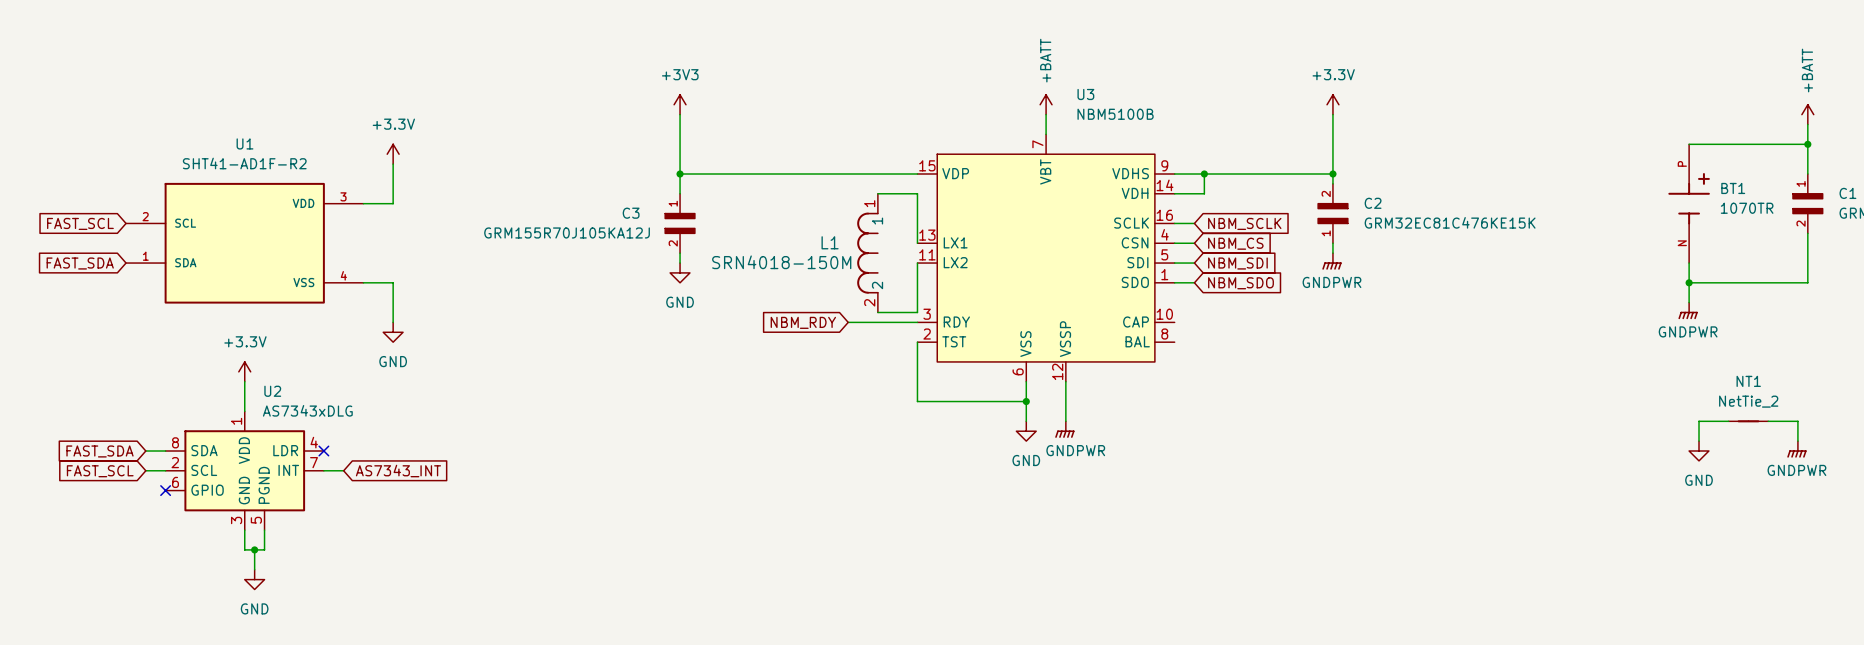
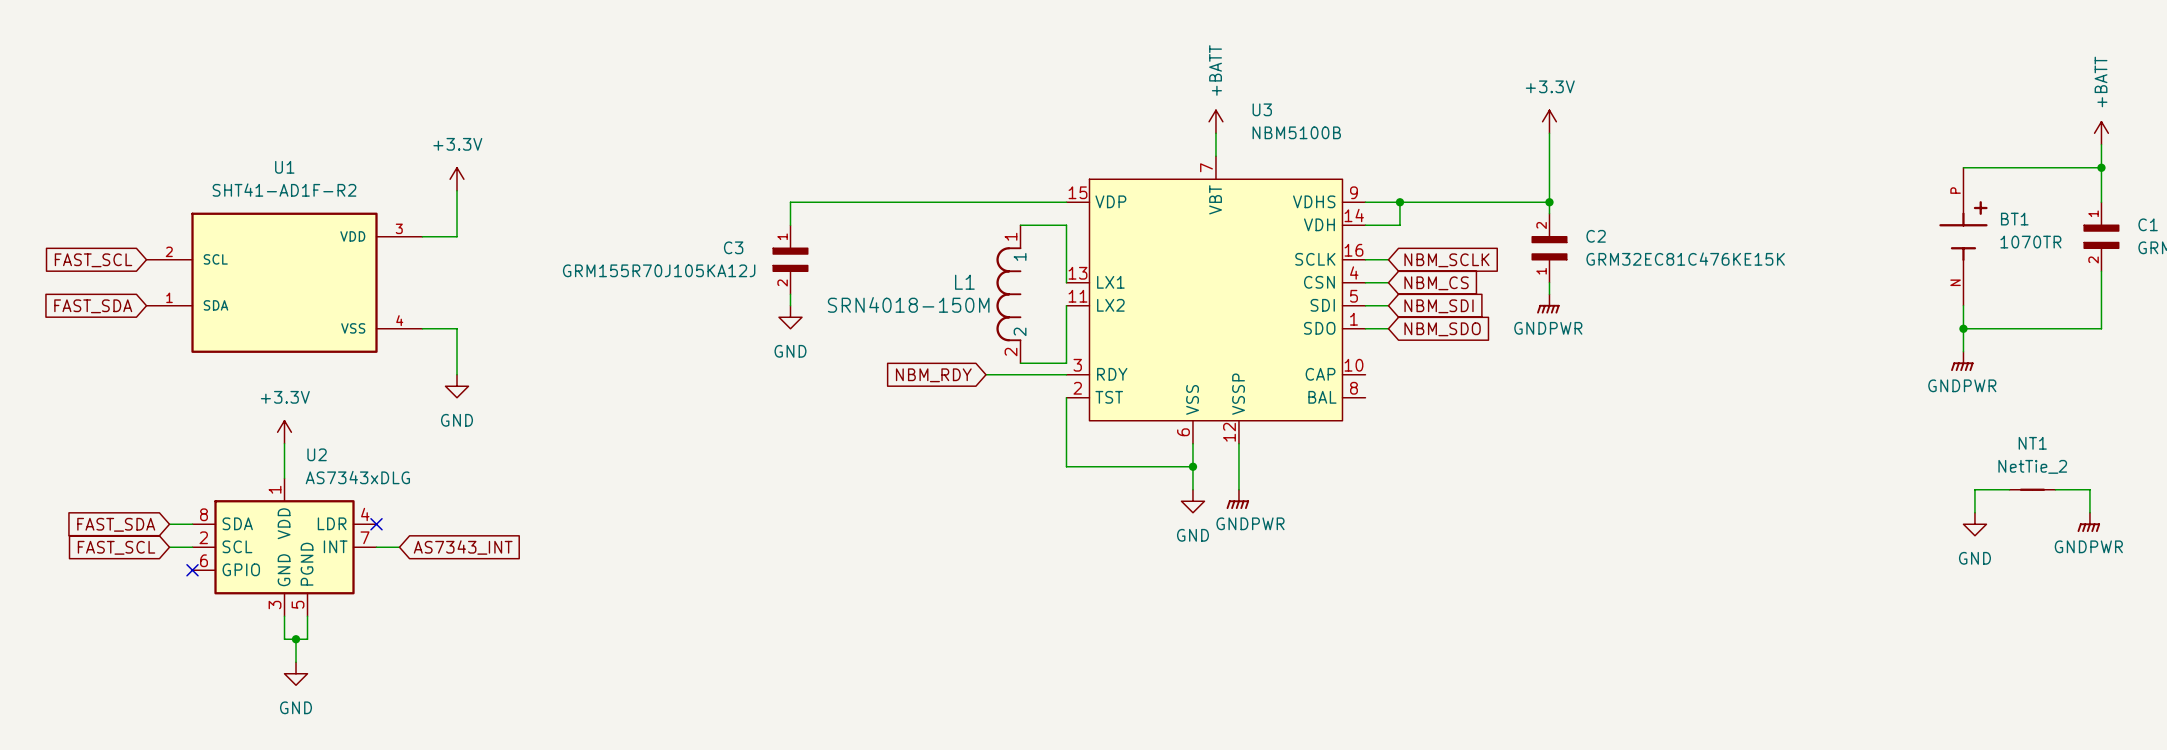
power symbol: +3V3 (680, 104) -> none
wire: (680, 114) (680, 174) -> none
junction: (680, 174) -> none

